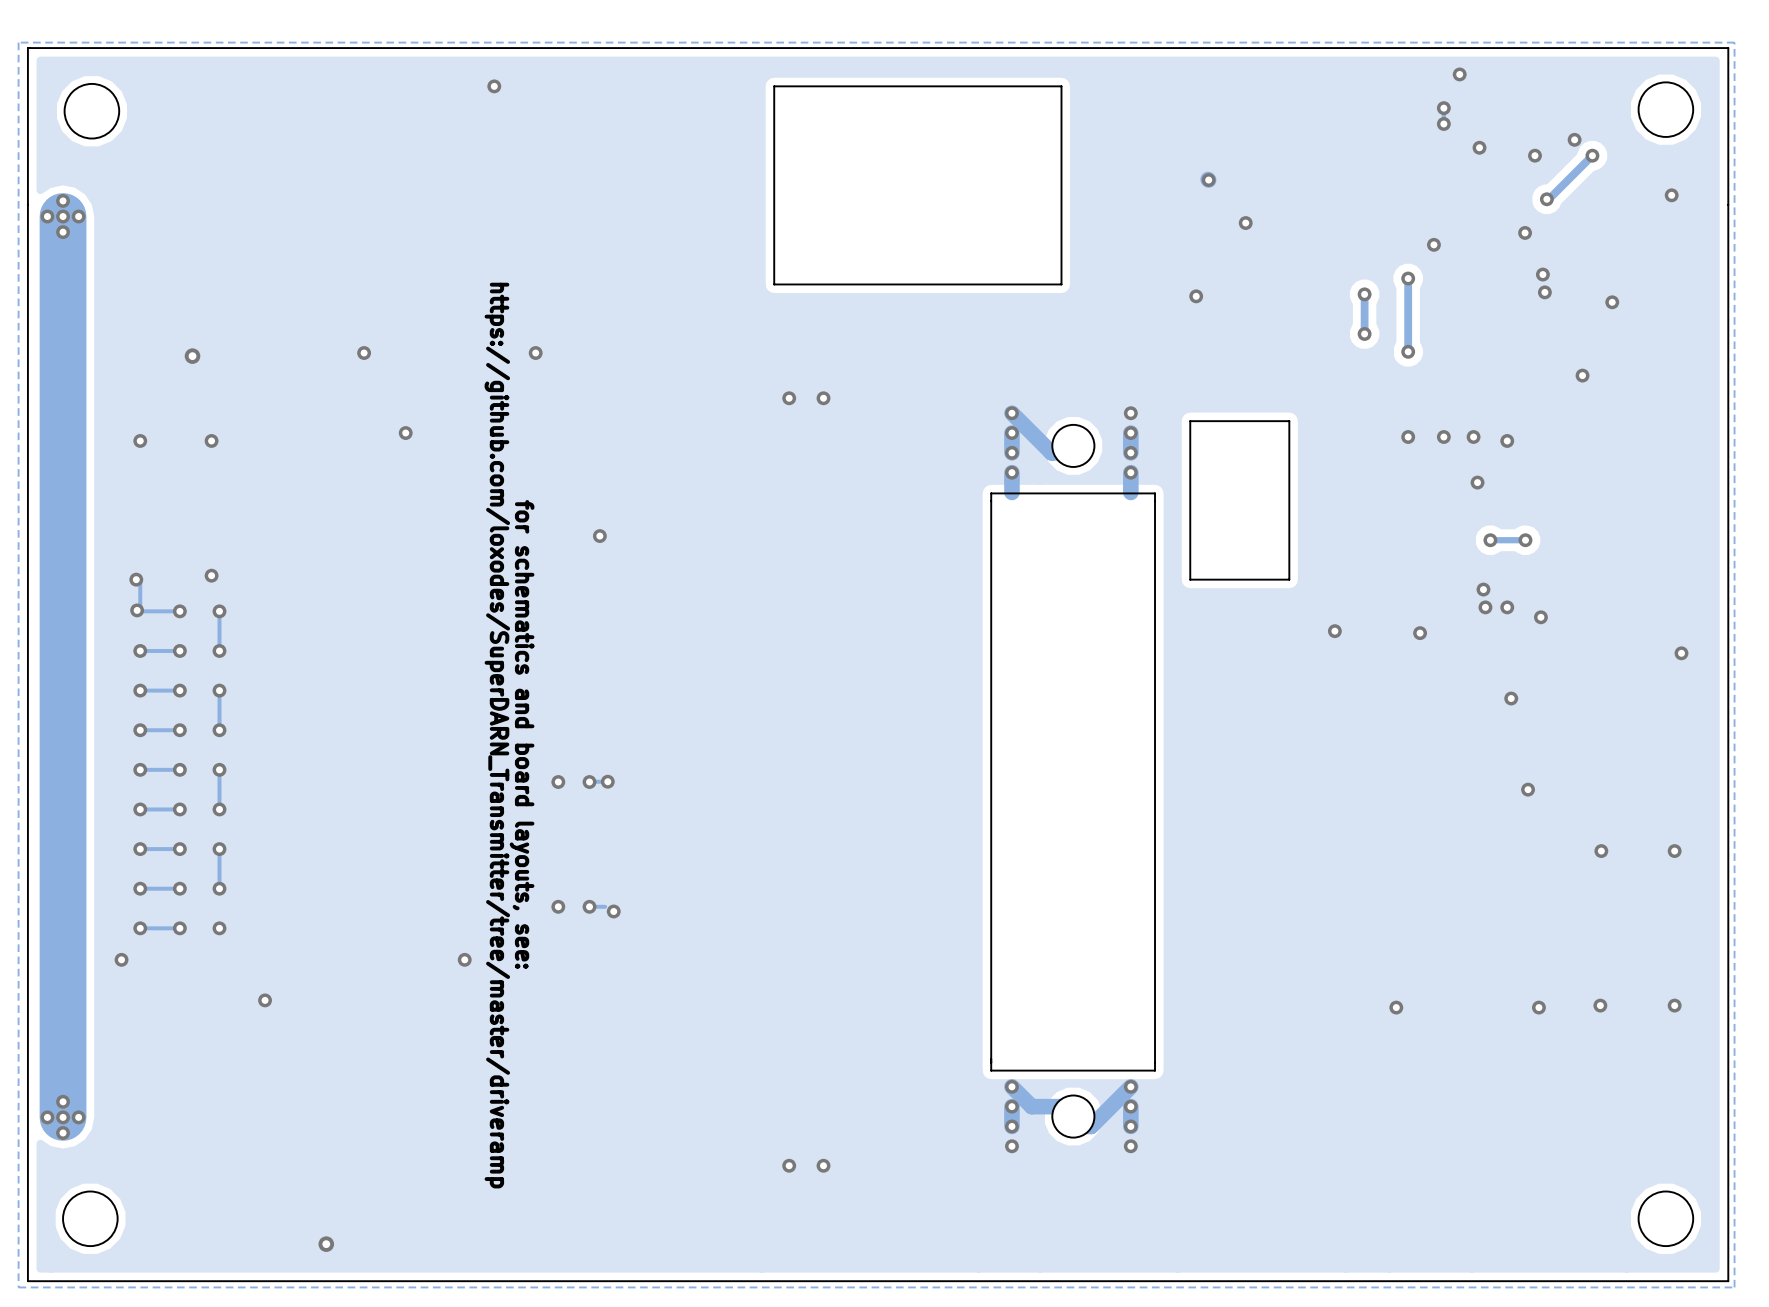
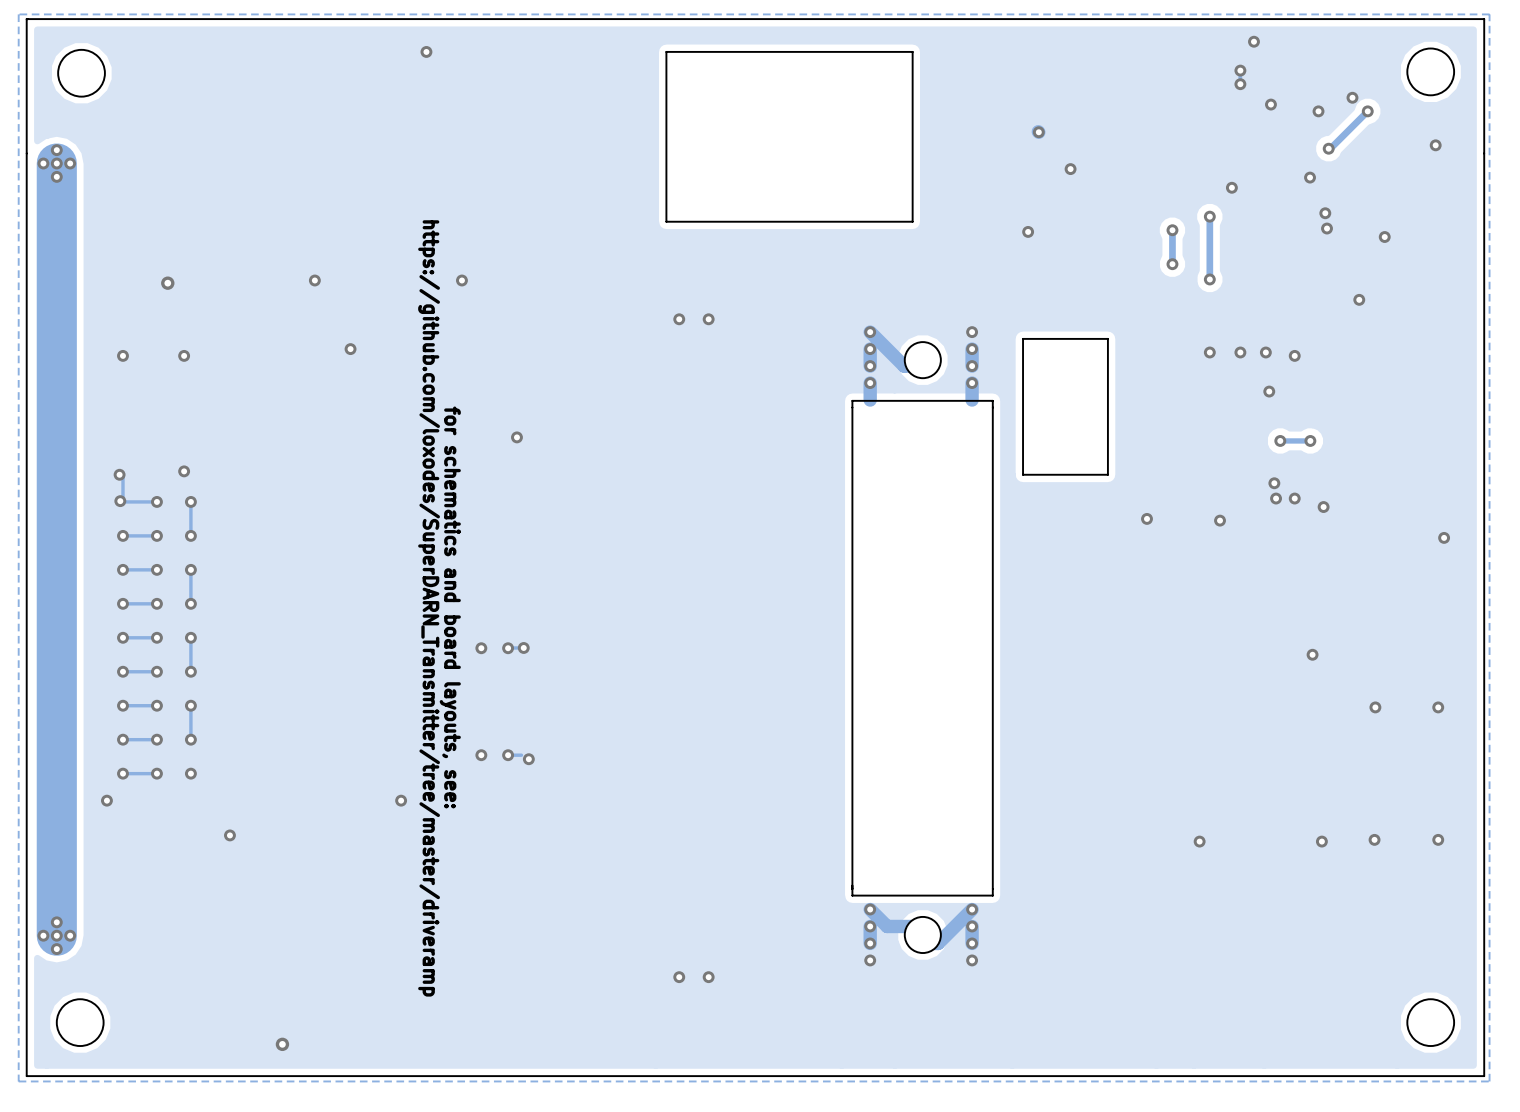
via: (1511, 698) -> none

